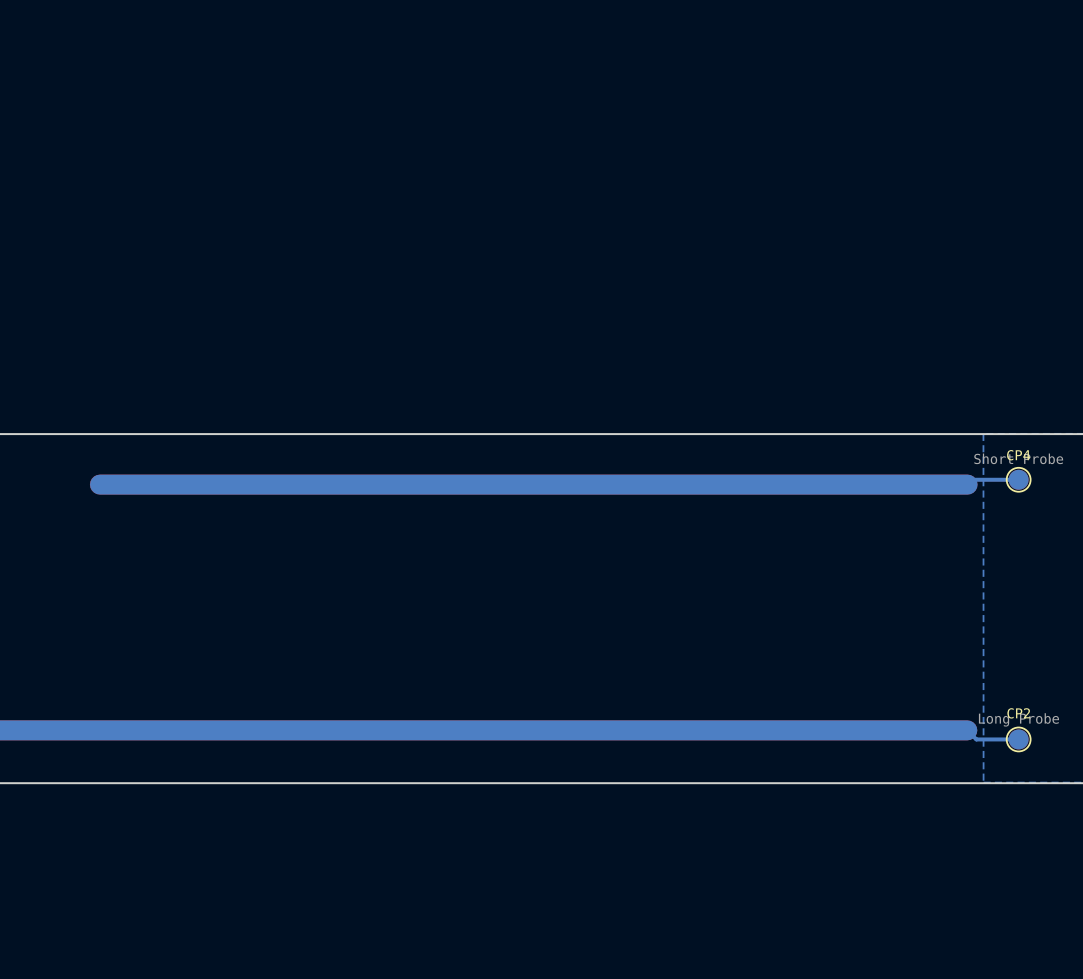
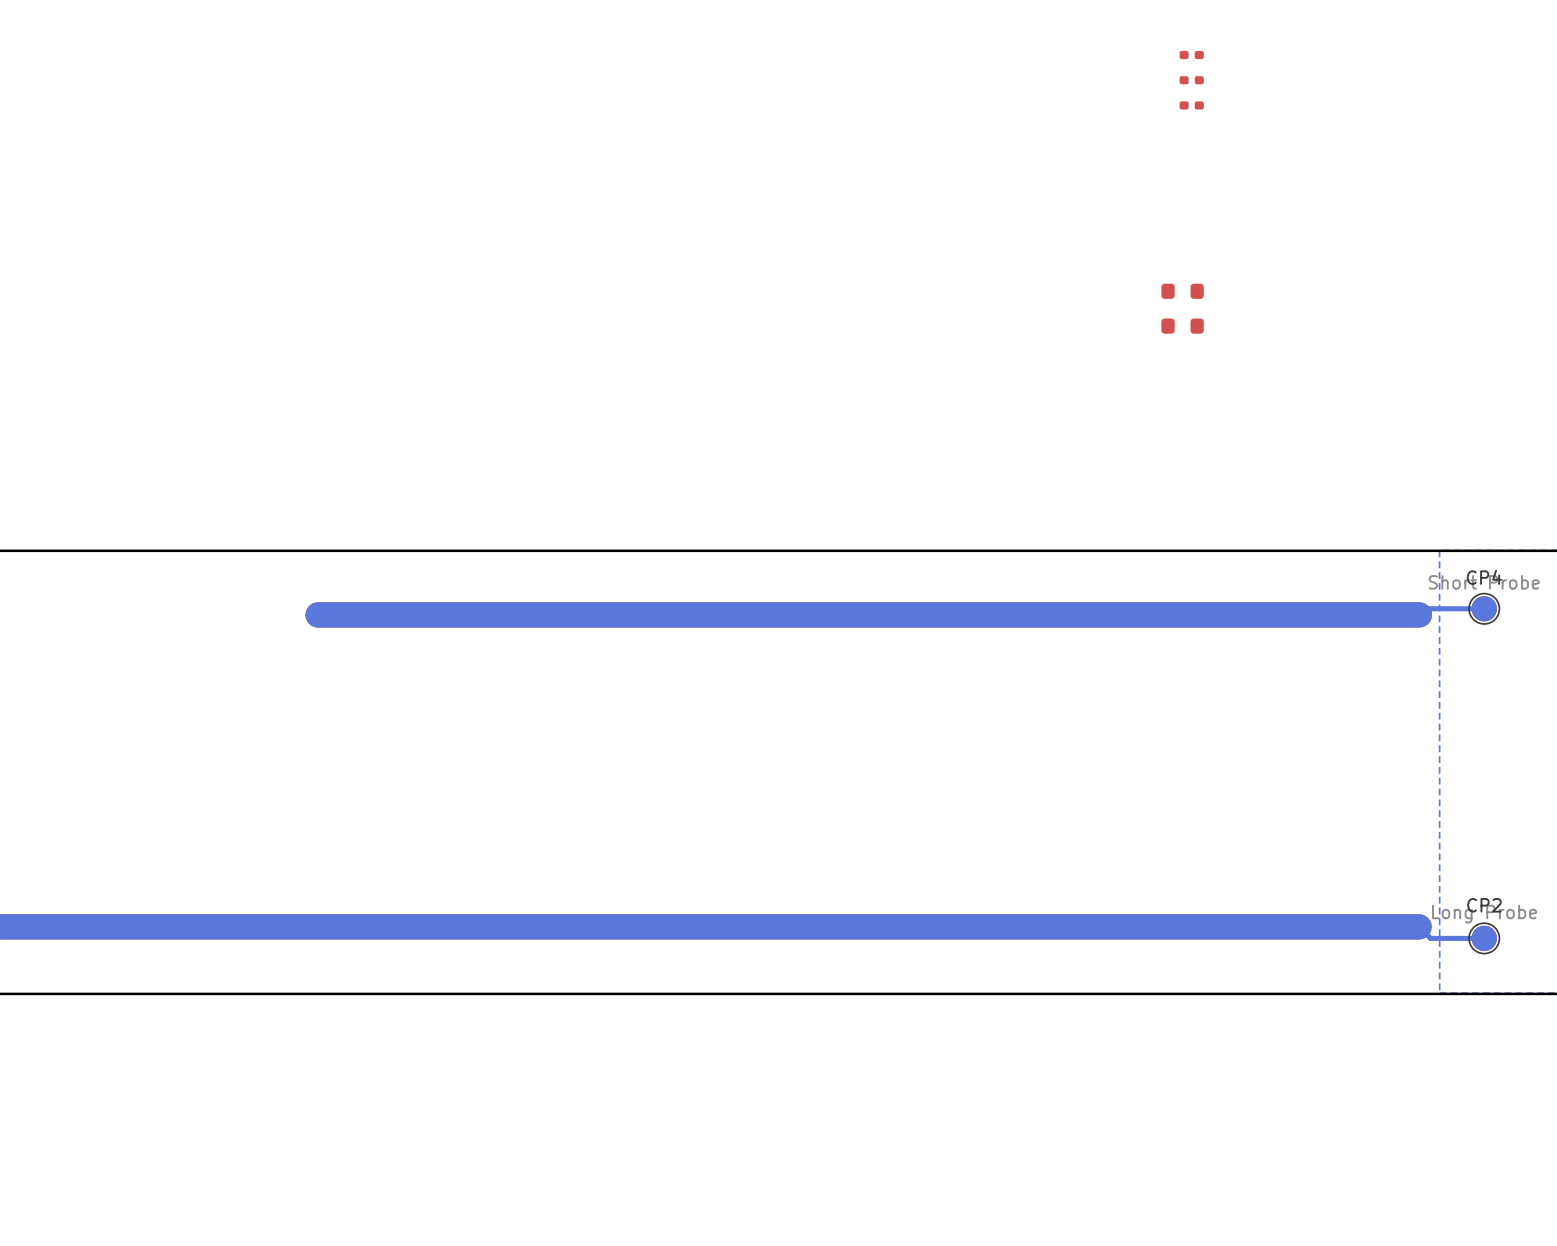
part: none -> (1191, 55)
part: none -> (1191, 80)
part: none -> (1191, 105)
part: none -> (1182, 291)
part: none -> (1182, 326)

